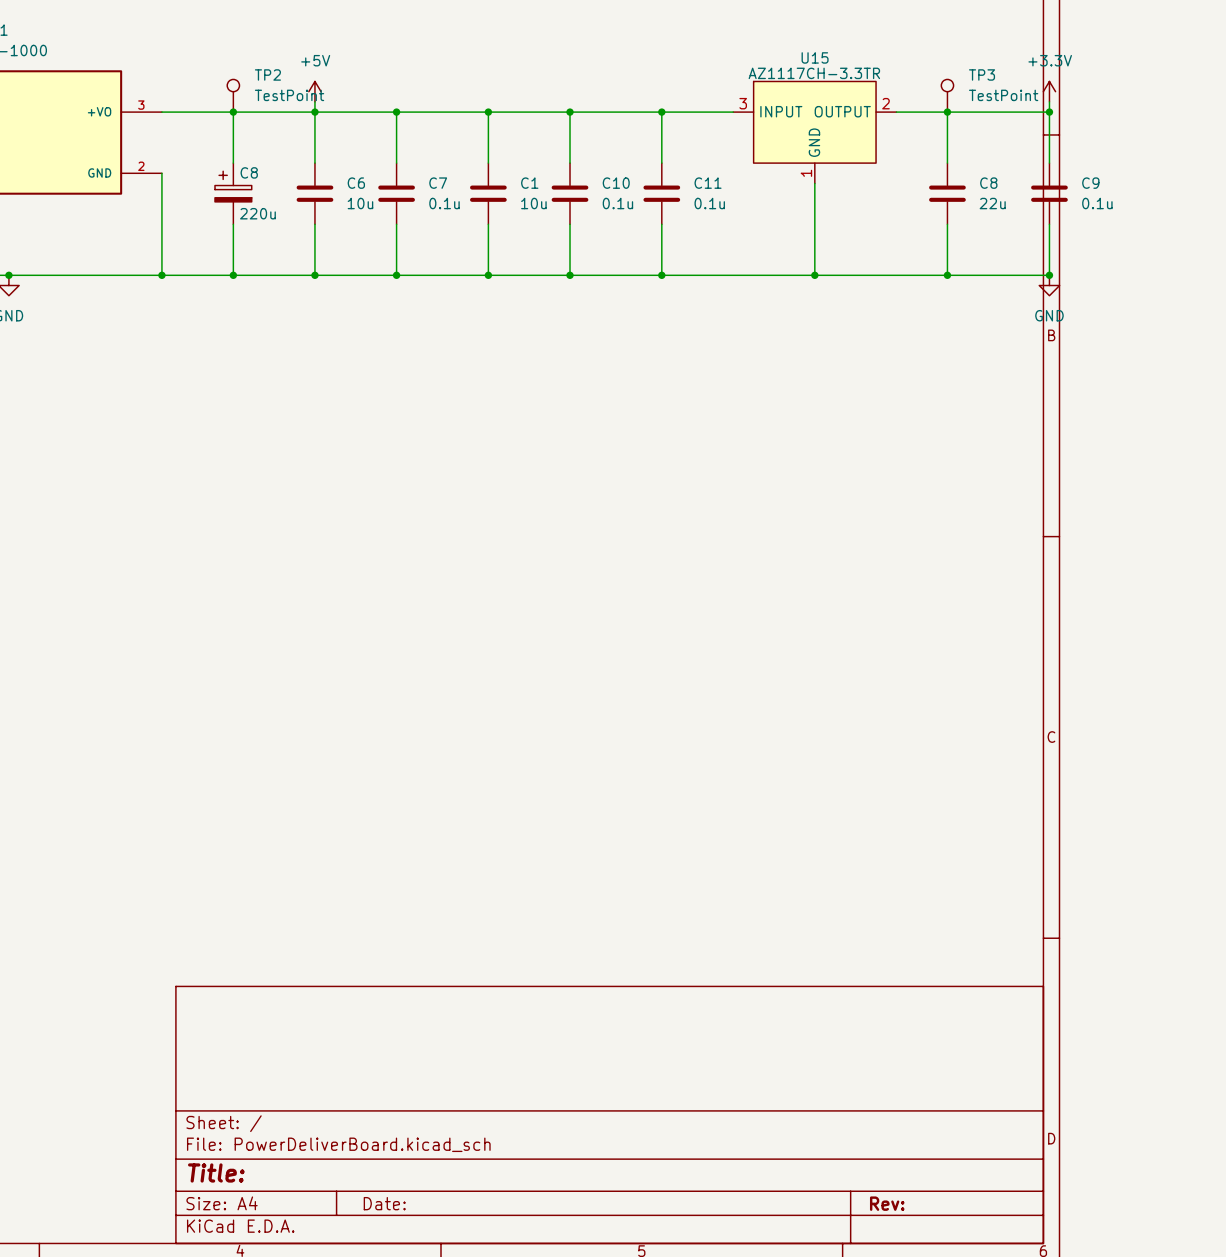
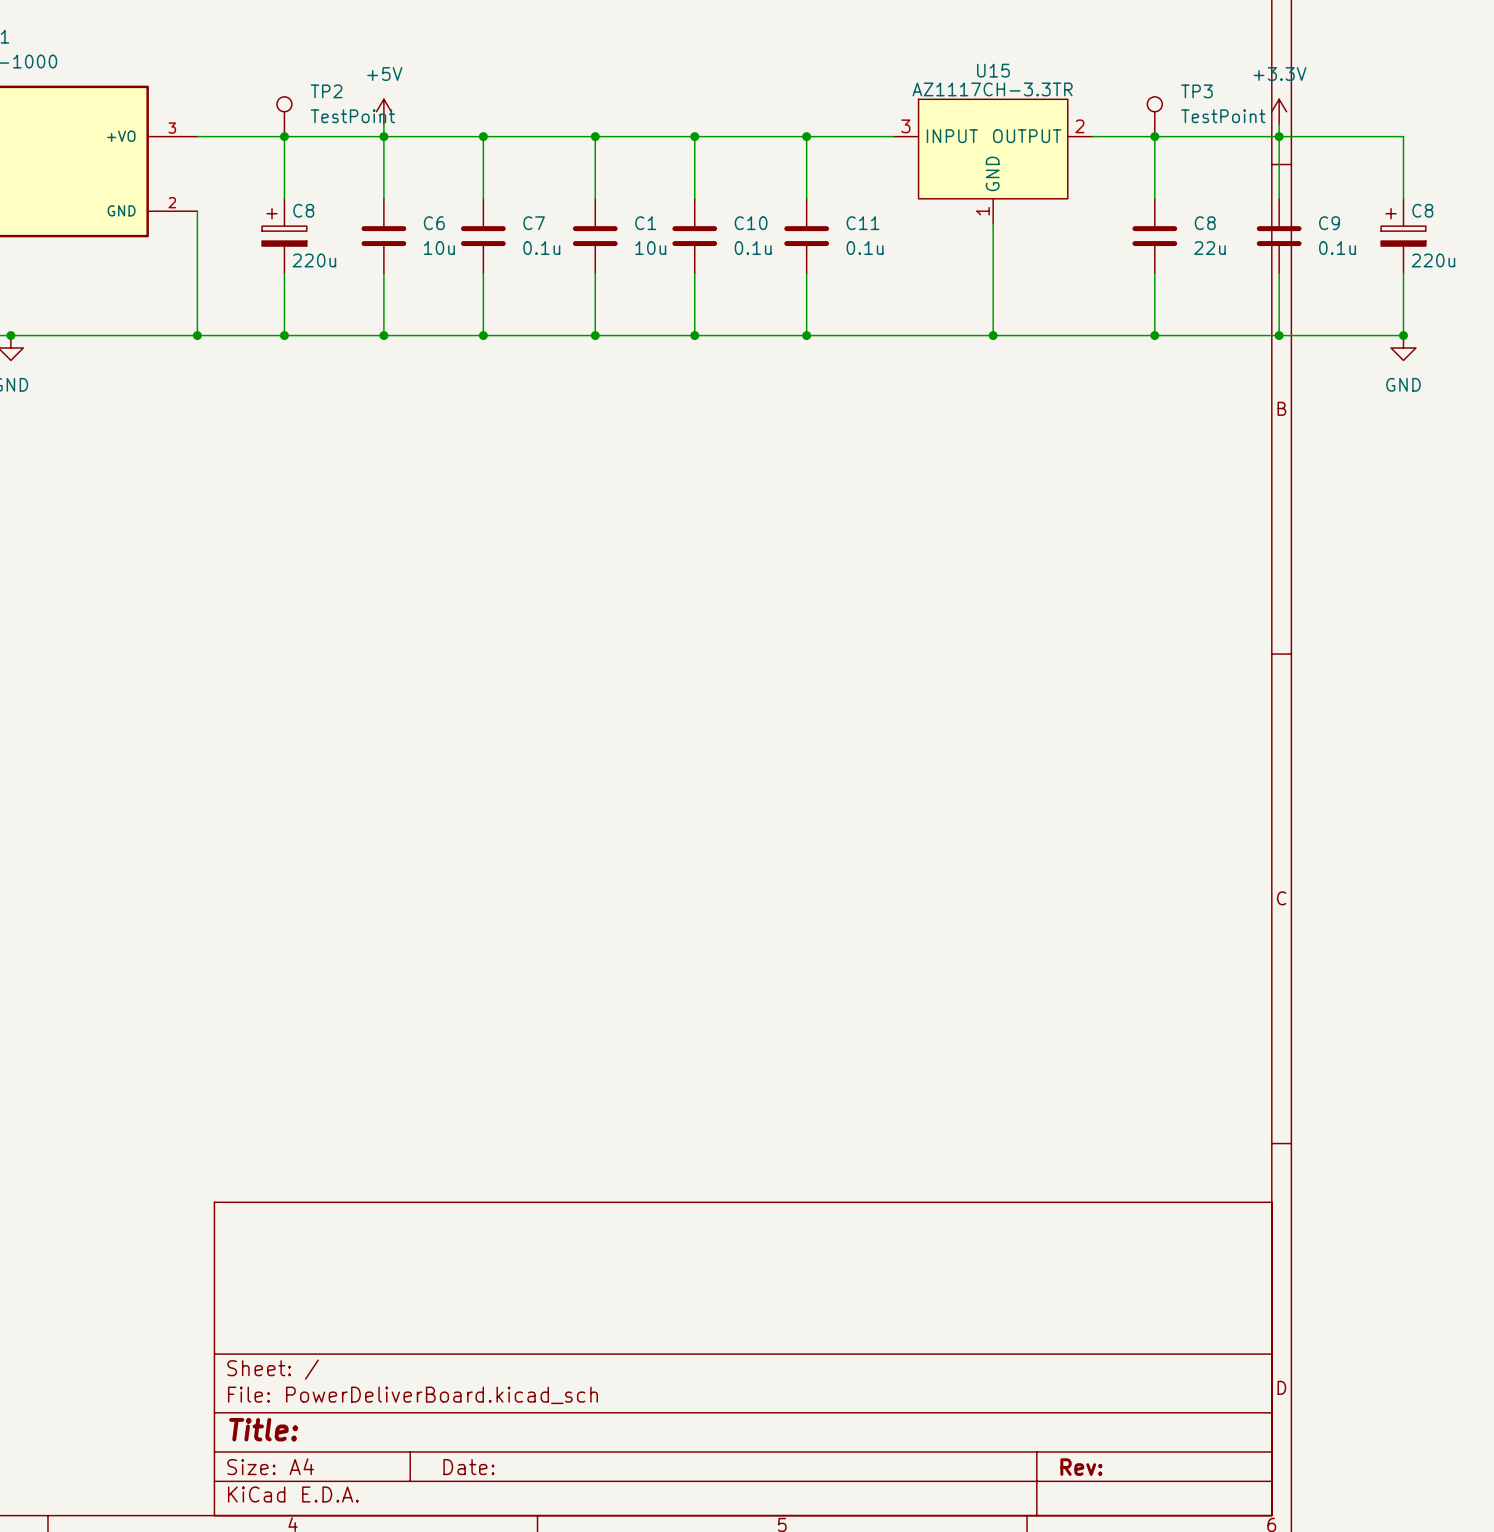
wire: none -> (1279, 136) (1403, 136) (1403, 198)
C8: none -> 220u (1403, 236)
wire: none -> (1403, 273) (1403, 335) (1279, 335)
junction: none -> (1403, 335)
power symbol position: GND (1049, 285) -> GND (1403, 348)

